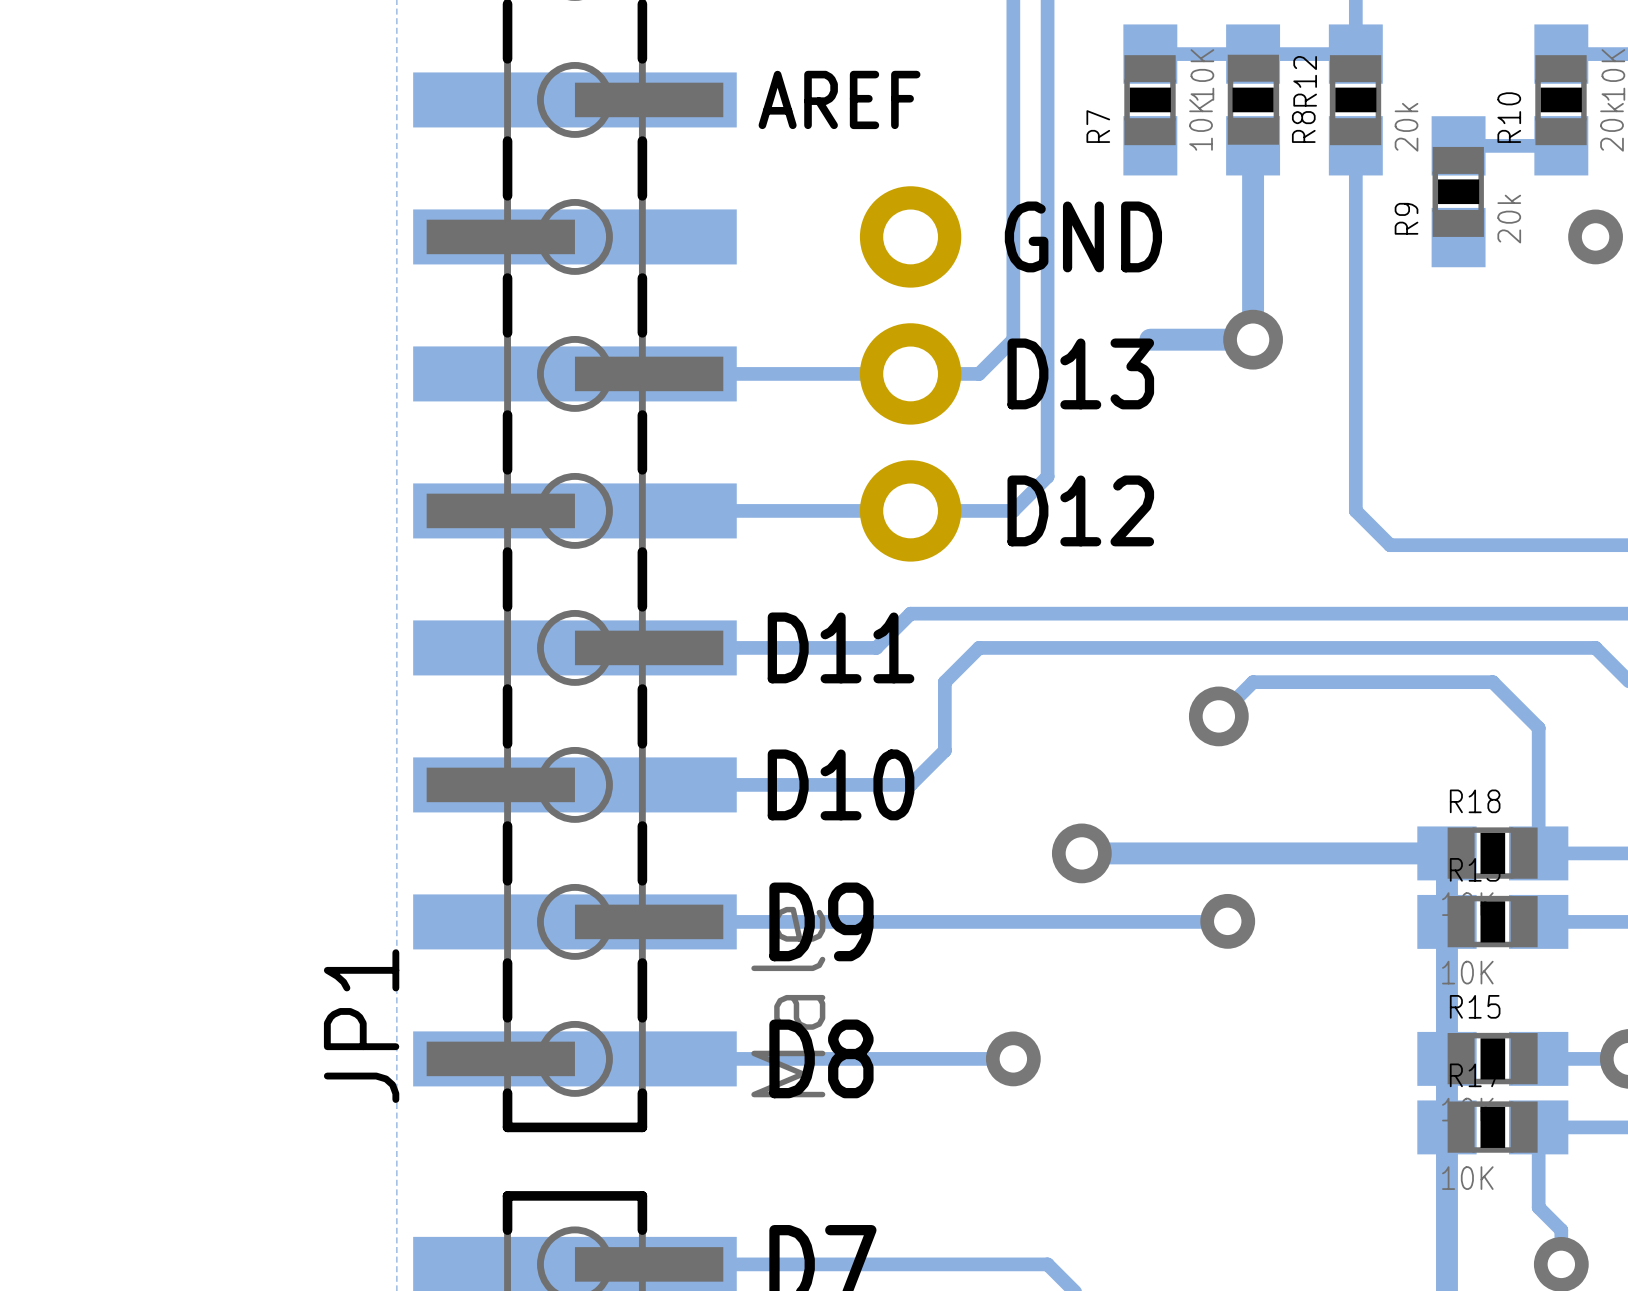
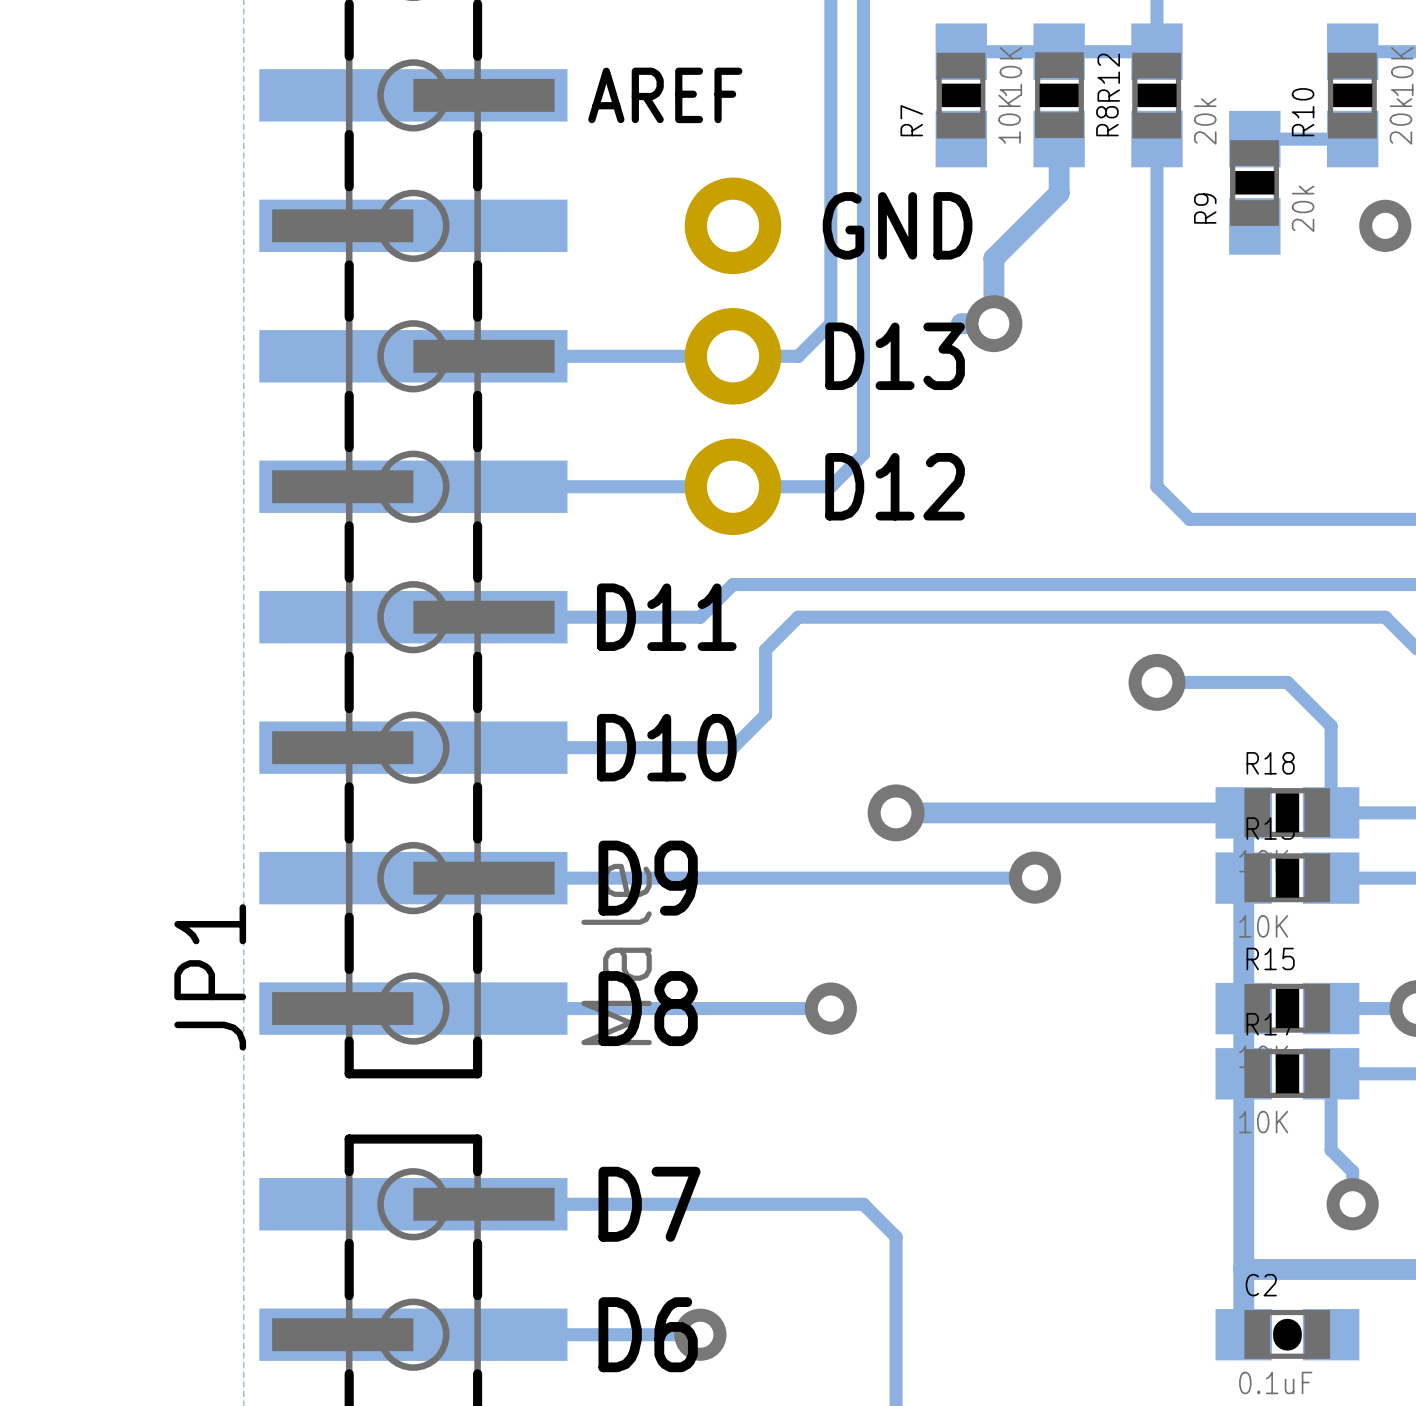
track: (1253, 202) (1253, 339) (1184, 339) -> (1059, 193) (993, 258) (993, 323)
via position: (1253, 339) -> (993, 323)
track: (1218, 716) (1253, 682) (1492, 682) (1538, 728) (1538, 762) -> (1156, 682) (1287, 682) (1331, 726)
via position: (1218, 716) -> (1156, 682)

